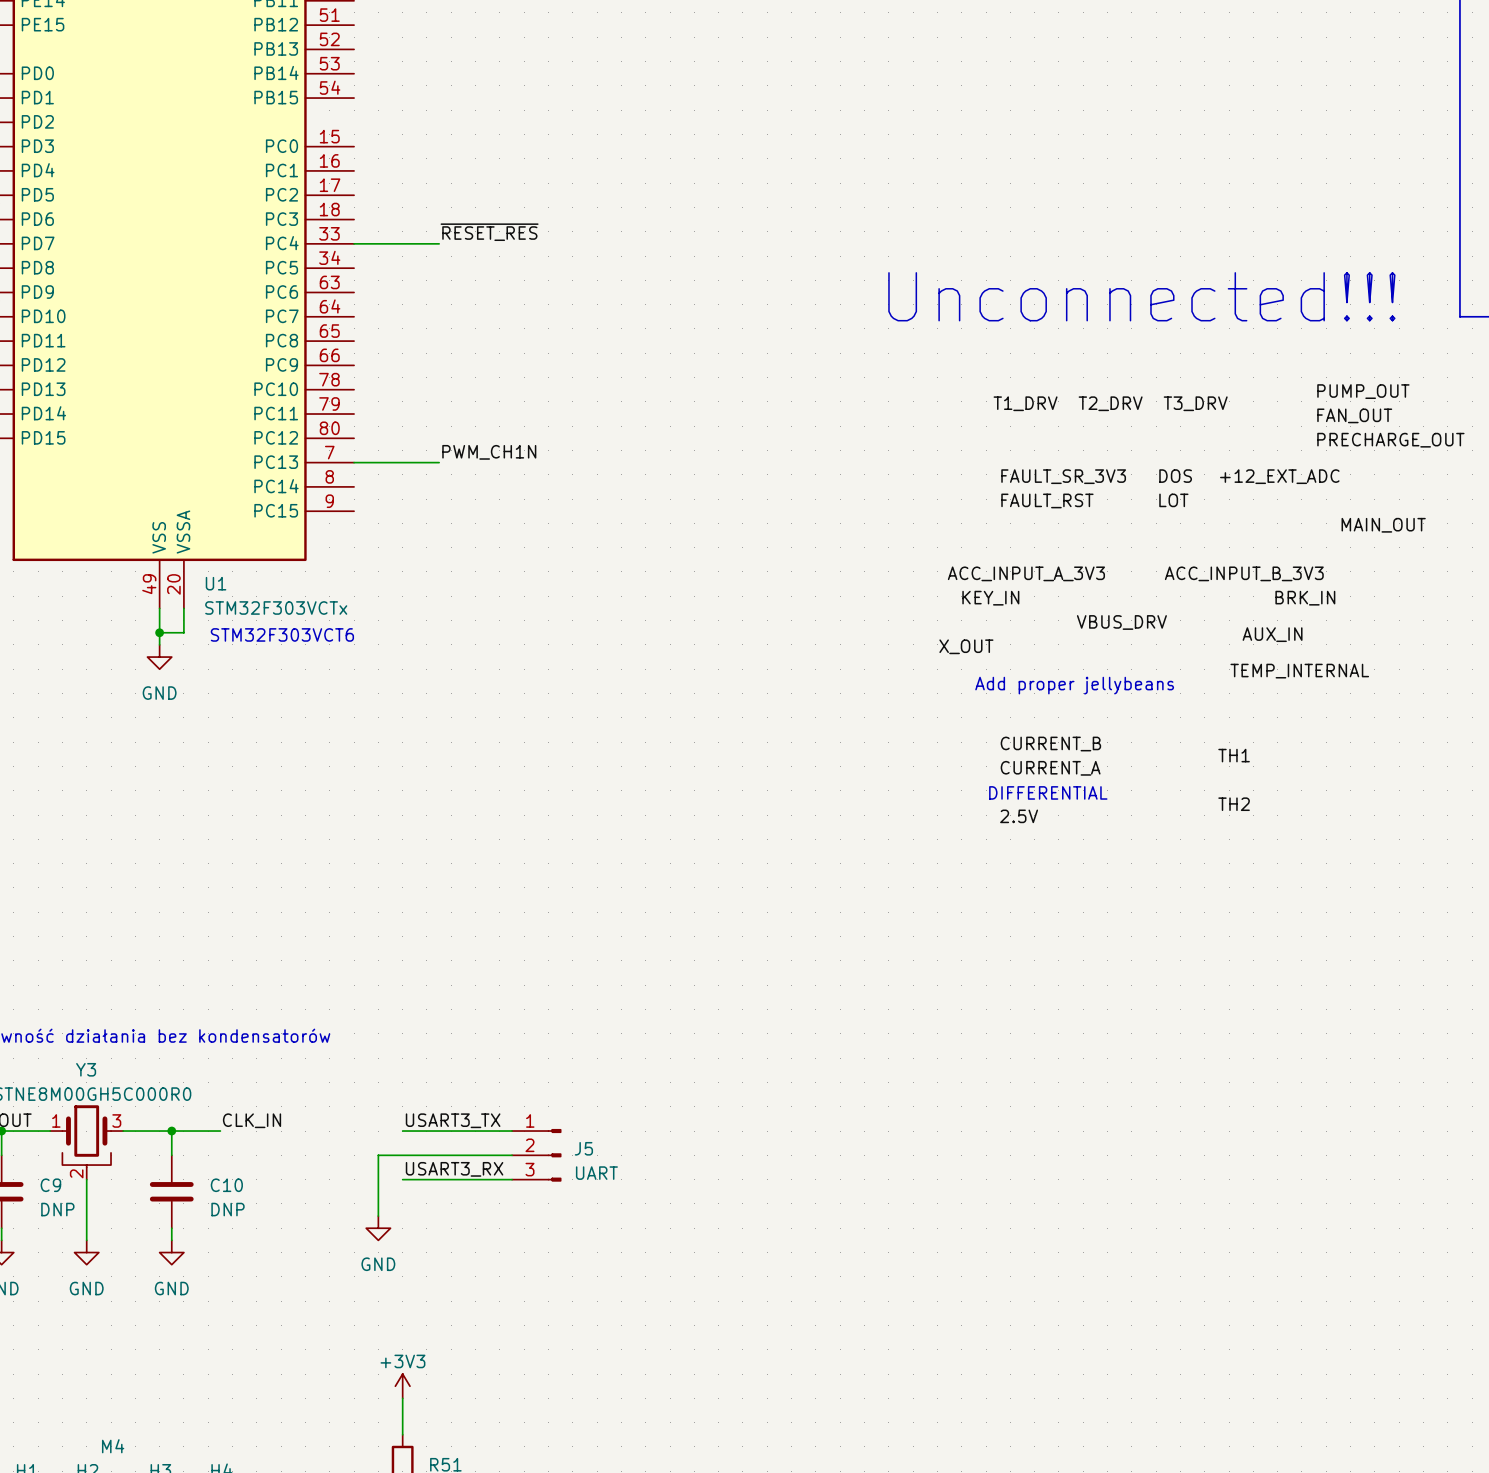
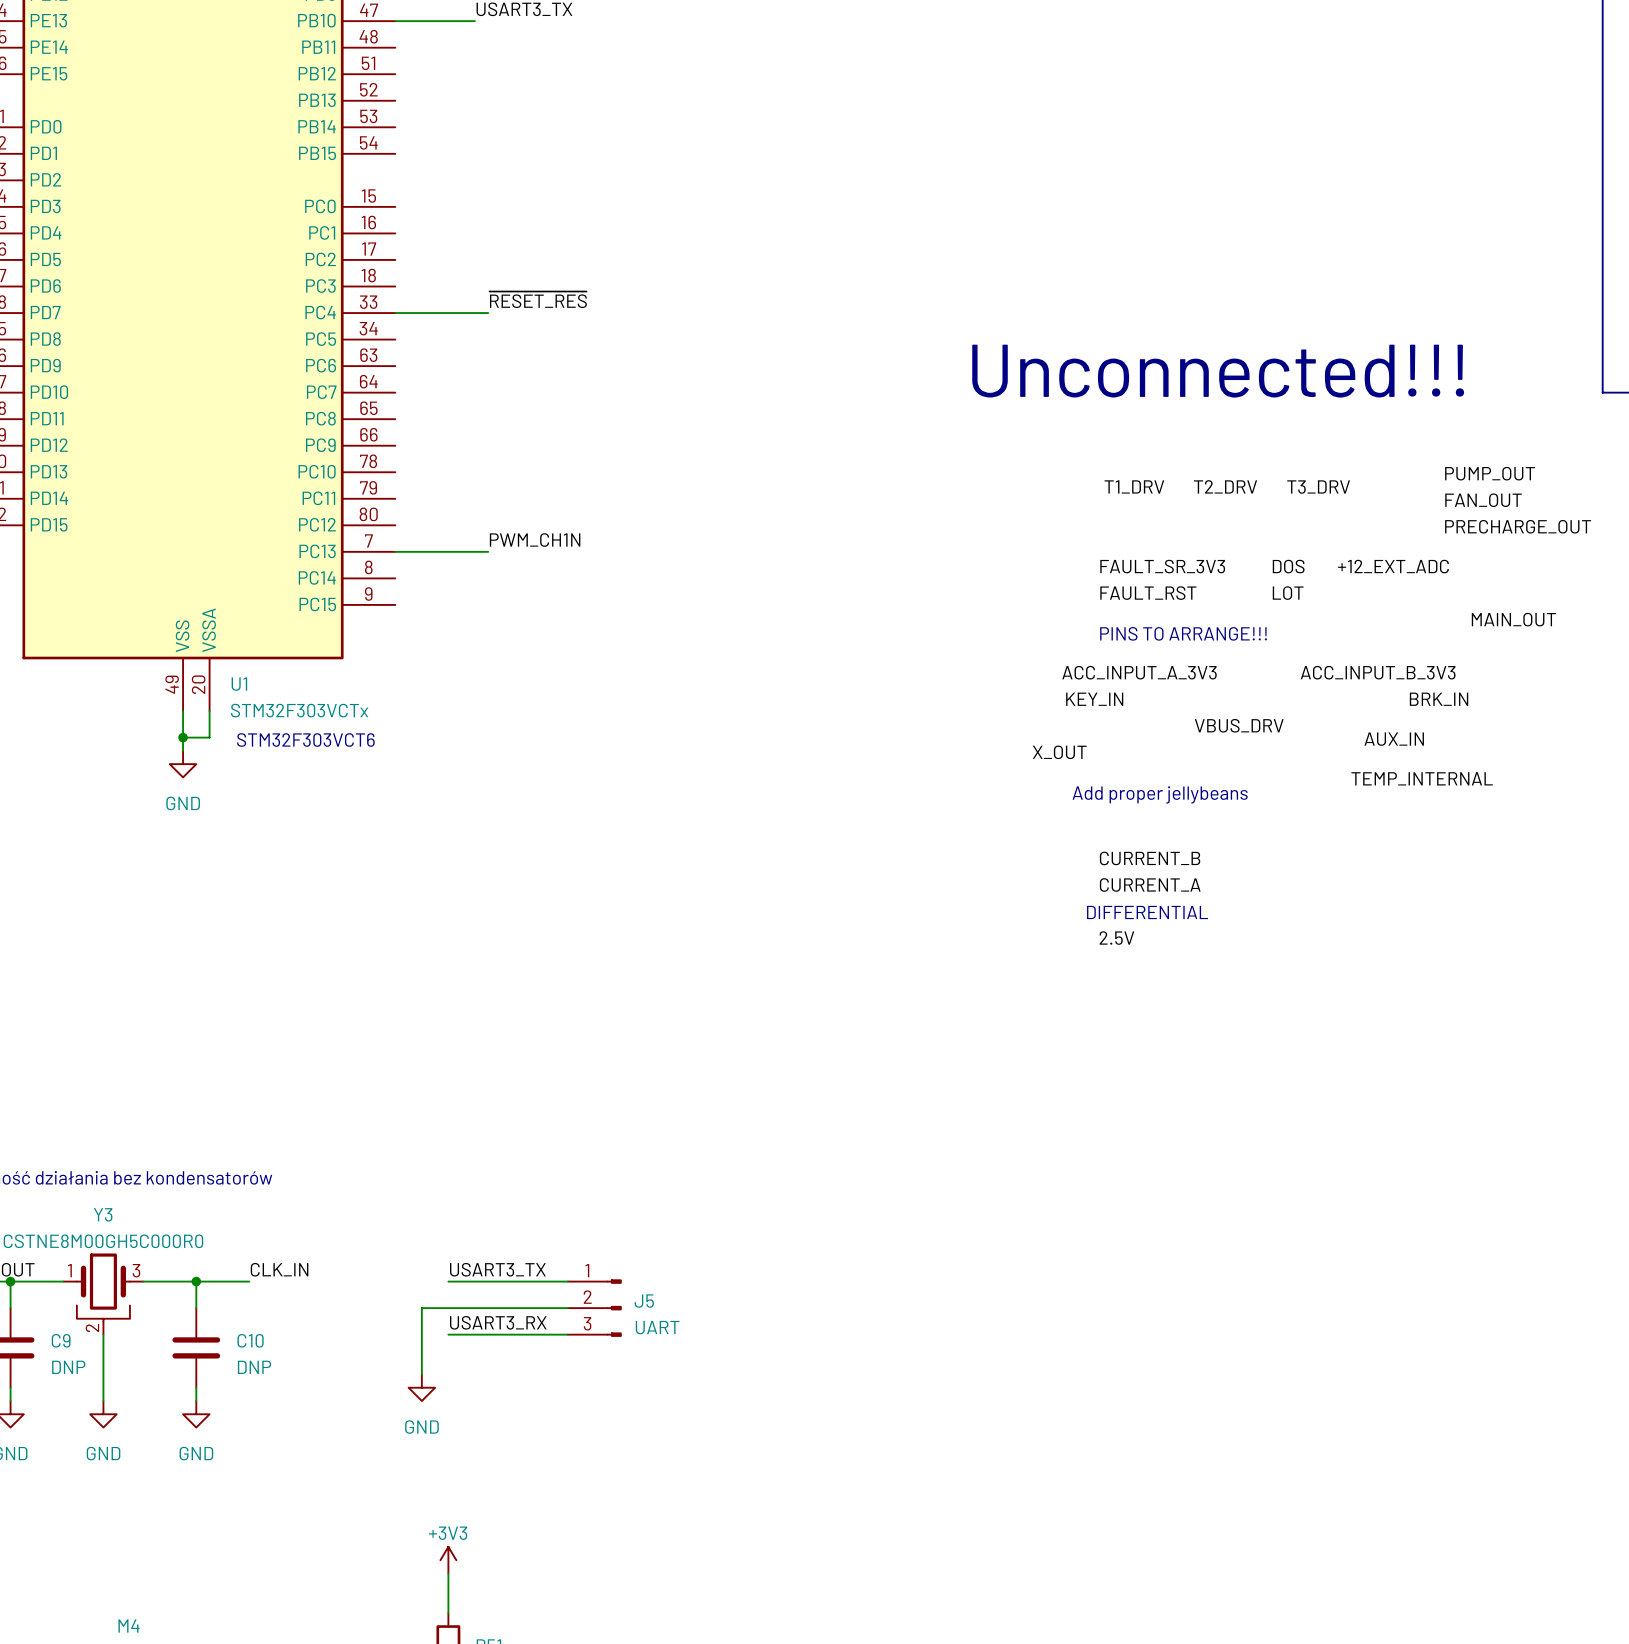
text: none -> PINS TO ARRANGE!!! (1183, 633)
label: TH1 (1234, 755) -> none
label: TH2 (1234, 804) -> none

